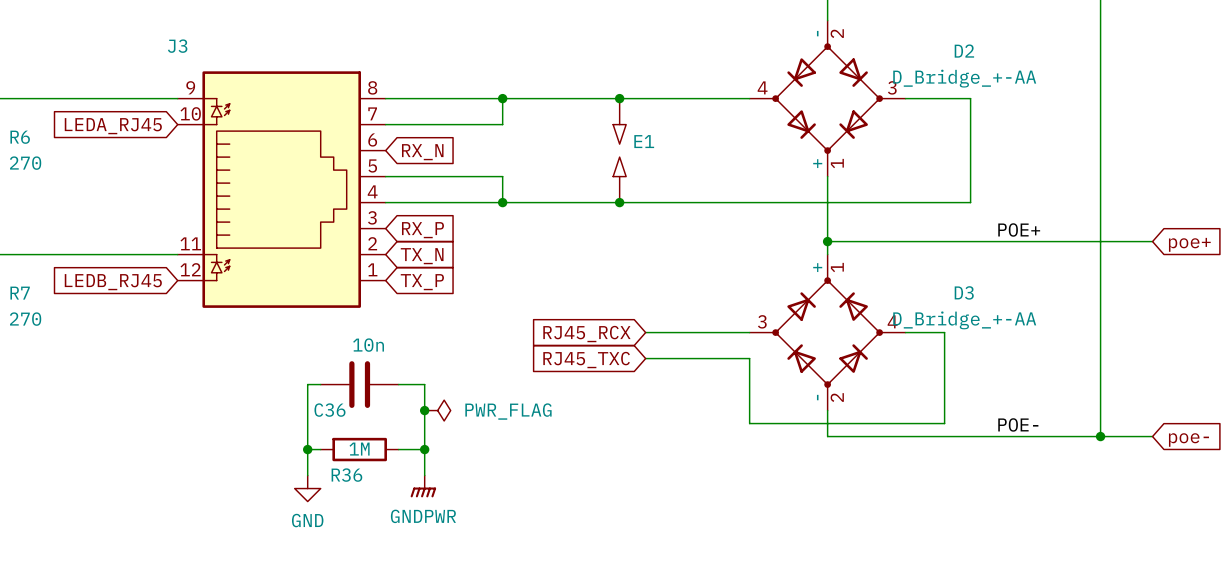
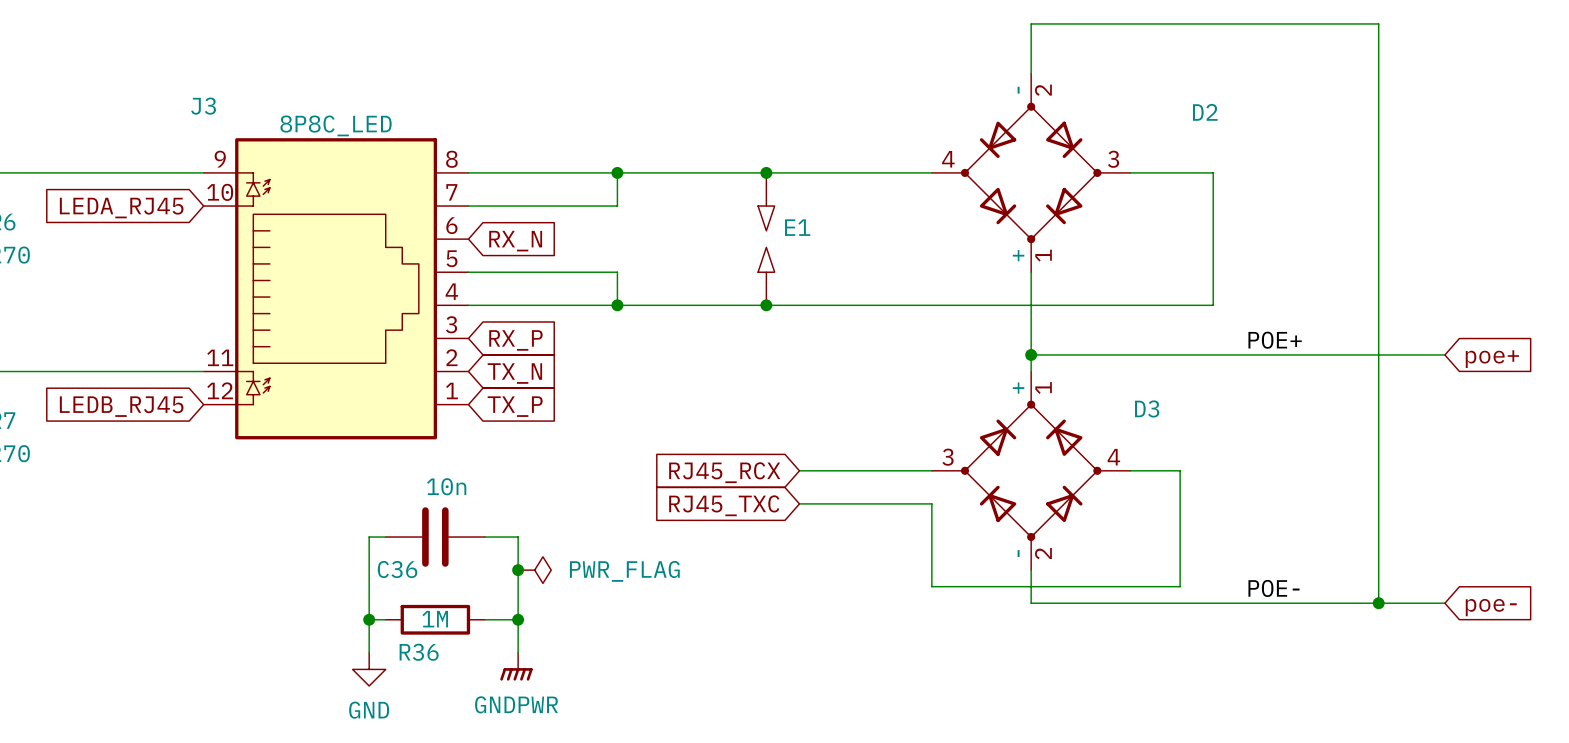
J3 value: none -> 8P8C_LED (336, 125)
D2 value: D_Bridge_+-AA (964, 78) -> none
D3 name position: D3 (964, 292) -> D3 (1147, 408)
D3 value: D_Bridge_+-AA (964, 320) -> none

